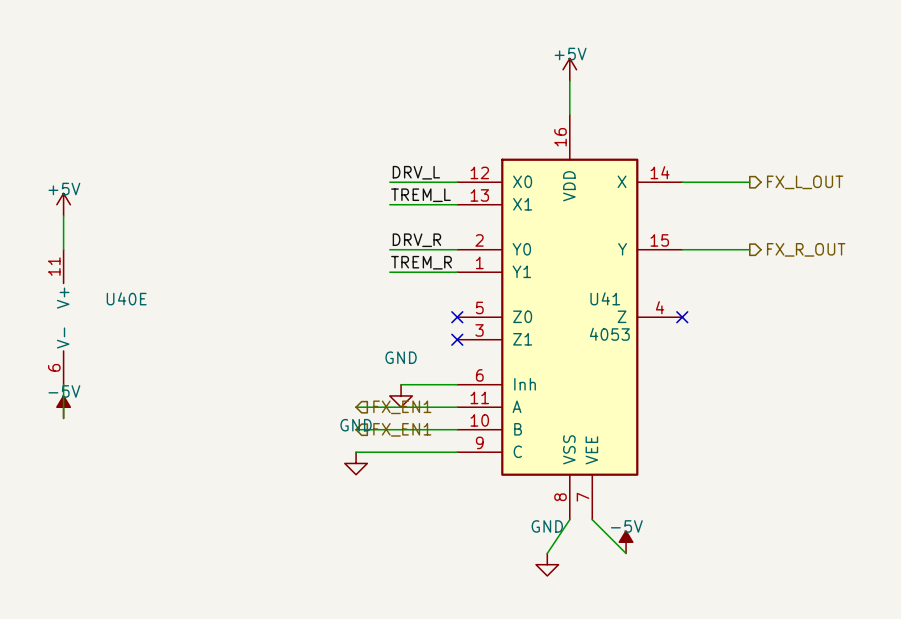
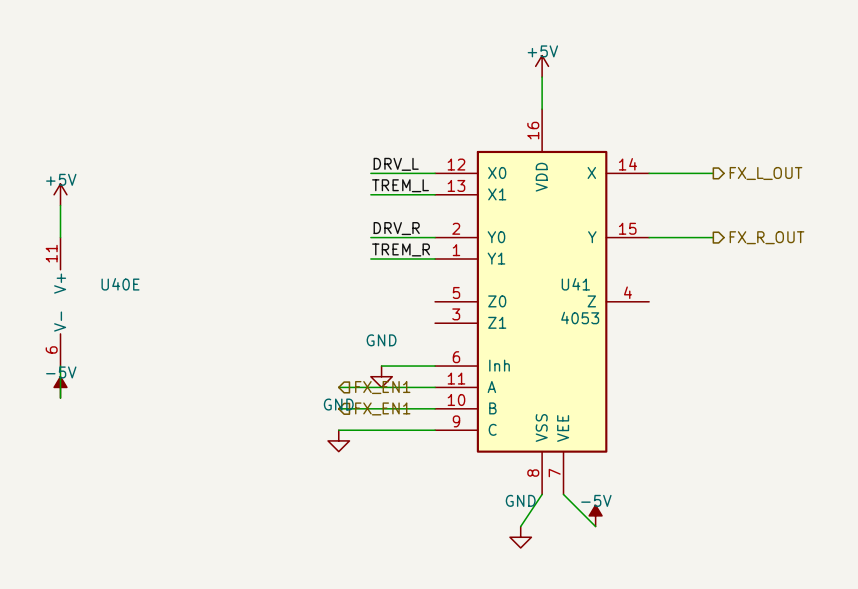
no-connect mark: (457, 317) -> none
no-connect mark: (682, 317) -> none
no-connect mark: (457, 339) -> none

